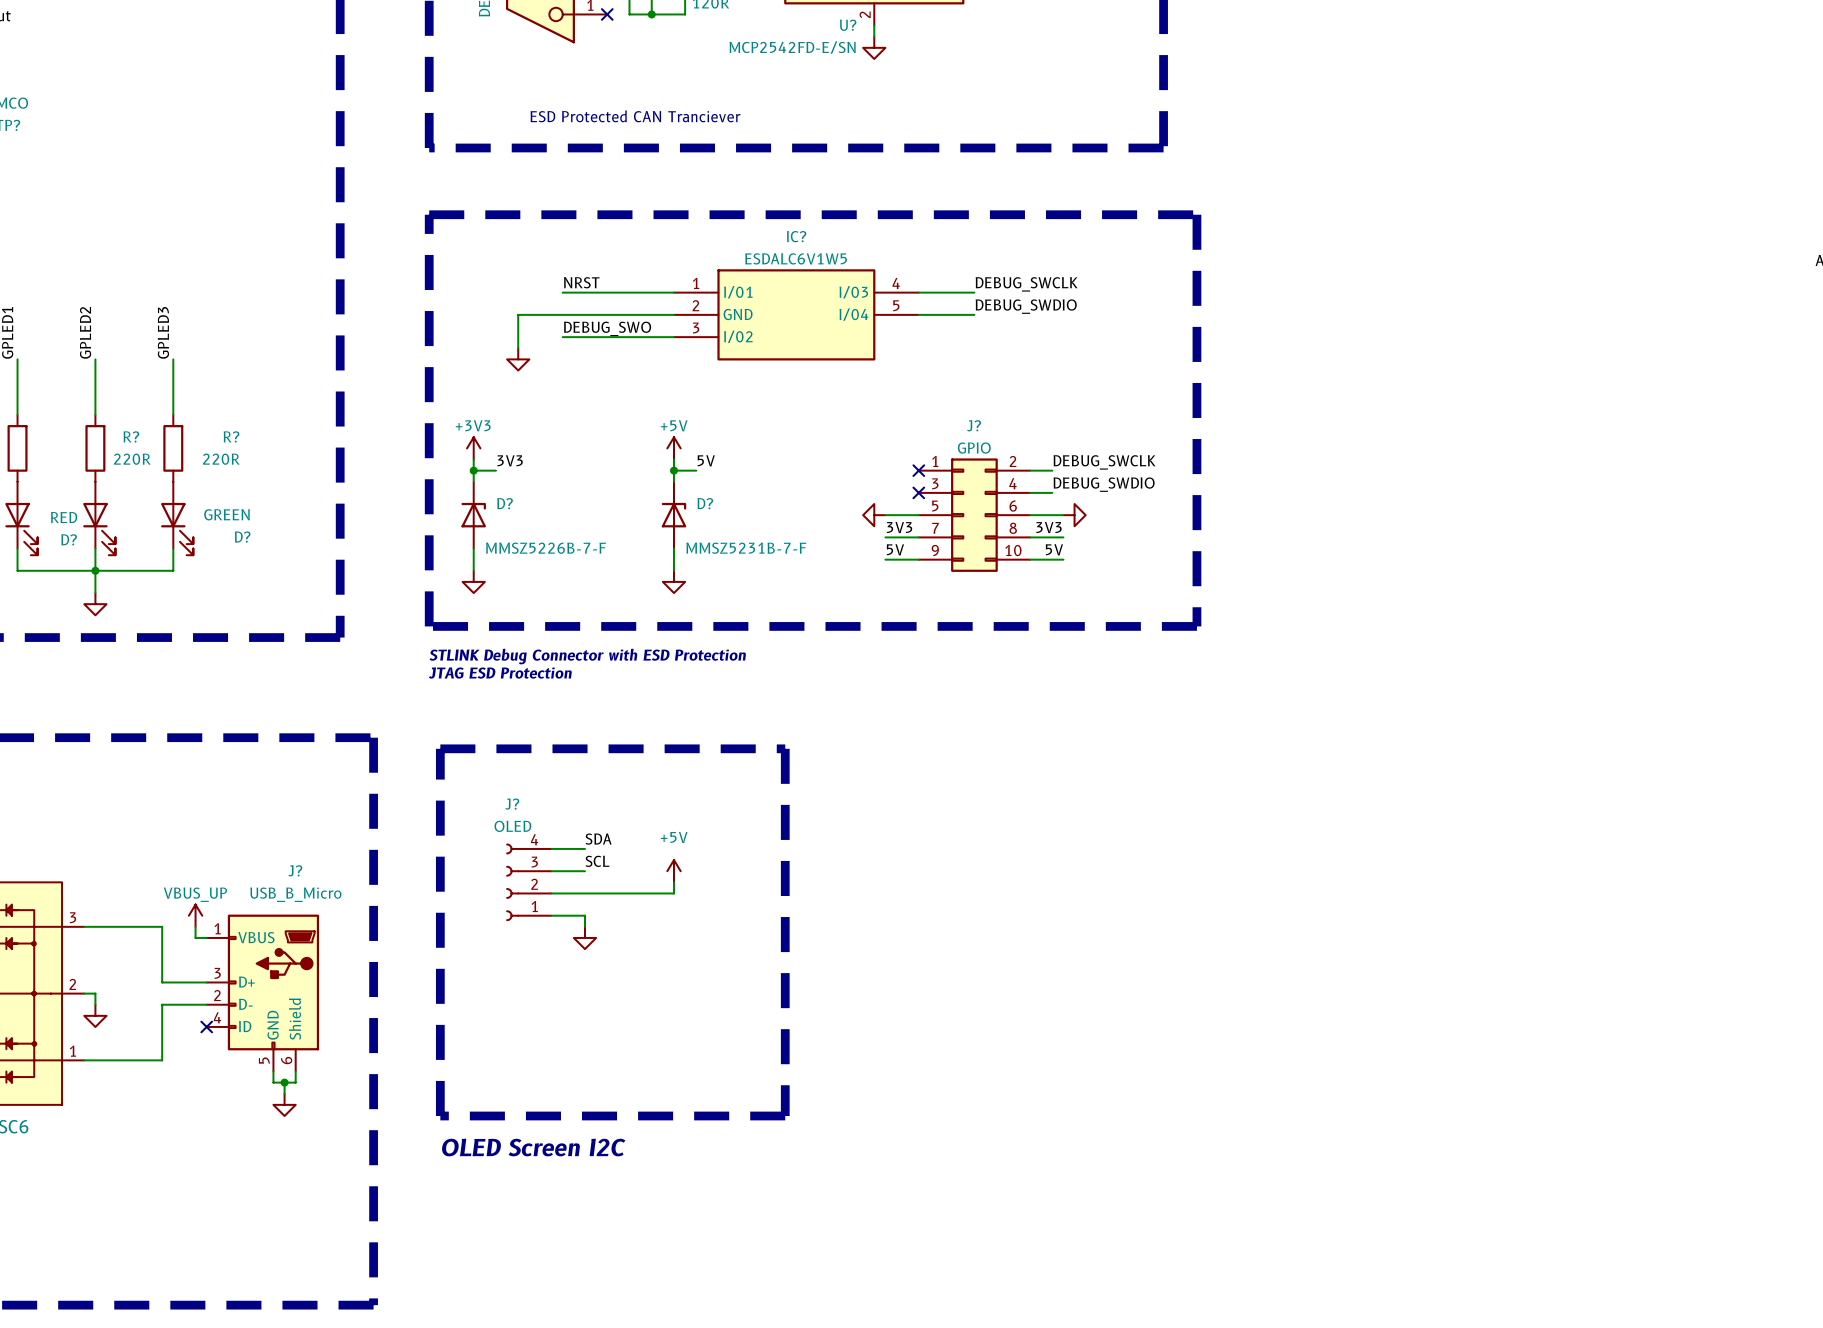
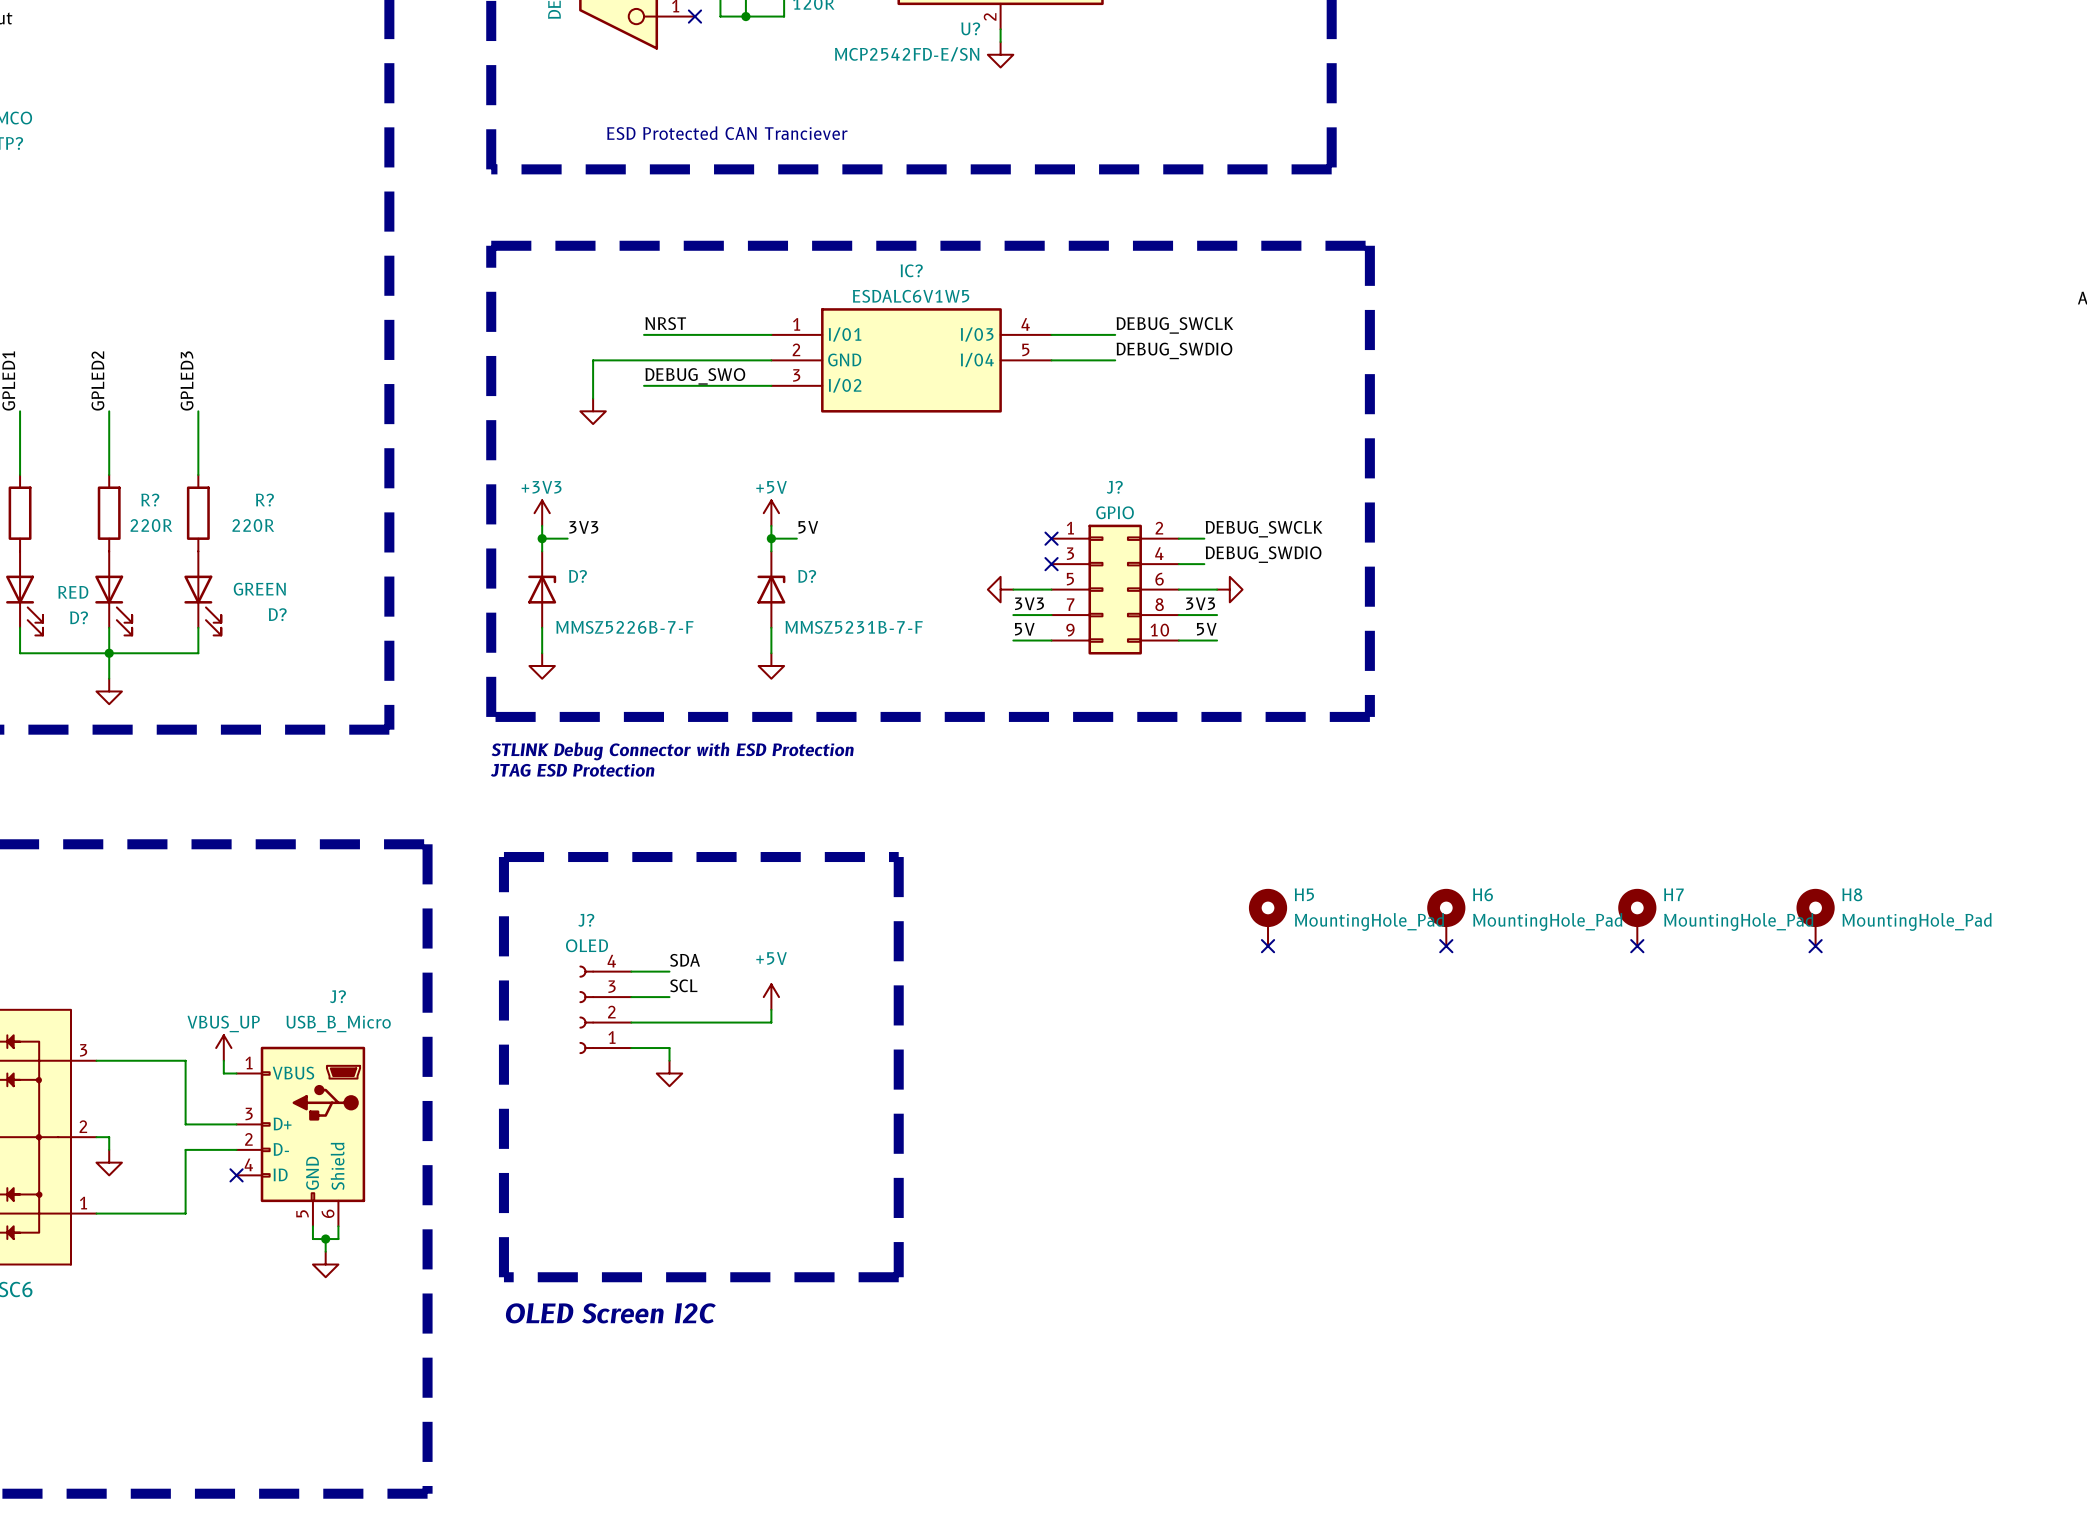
H5: none -> MountingHole_Pad (1268, 917)
H6: none -> MountingHole_Pad (1446, 917)
H7: none -> MountingHole_Pad (1637, 917)
H8: none -> MountingHole_Pad (1815, 917)
no-connect mark: none -> (1268, 946)
no-connect mark: none -> (1446, 946)
no-connect mark: none -> (1637, 946)
no-connect mark: none -> (1815, 946)

